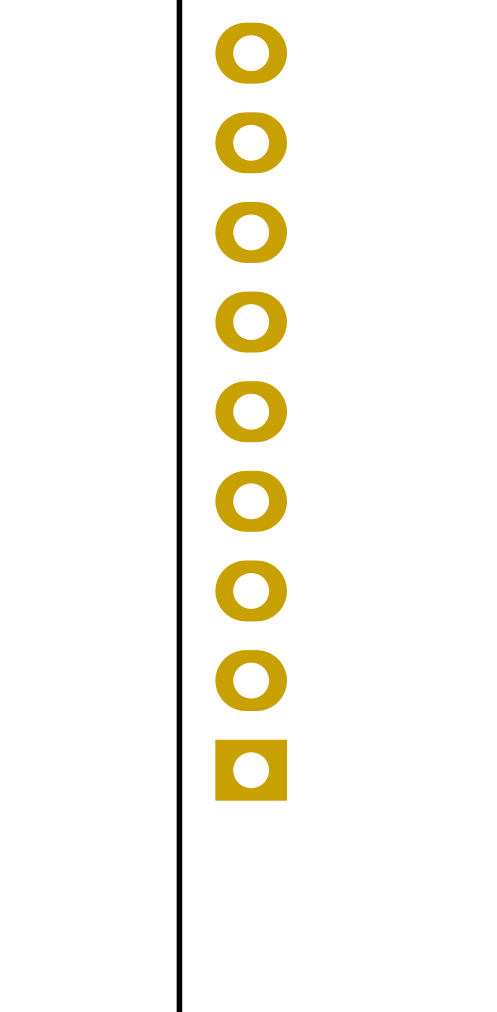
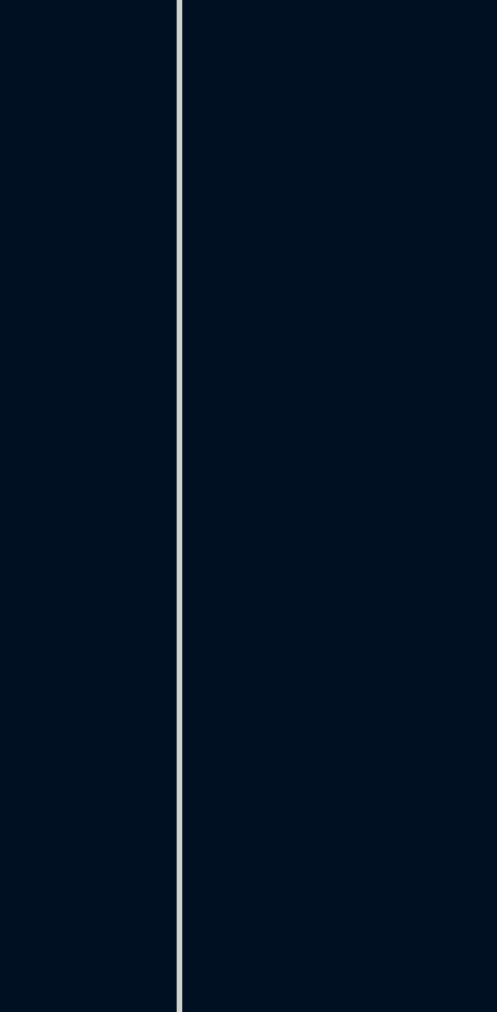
part: (251, 411) -> none

